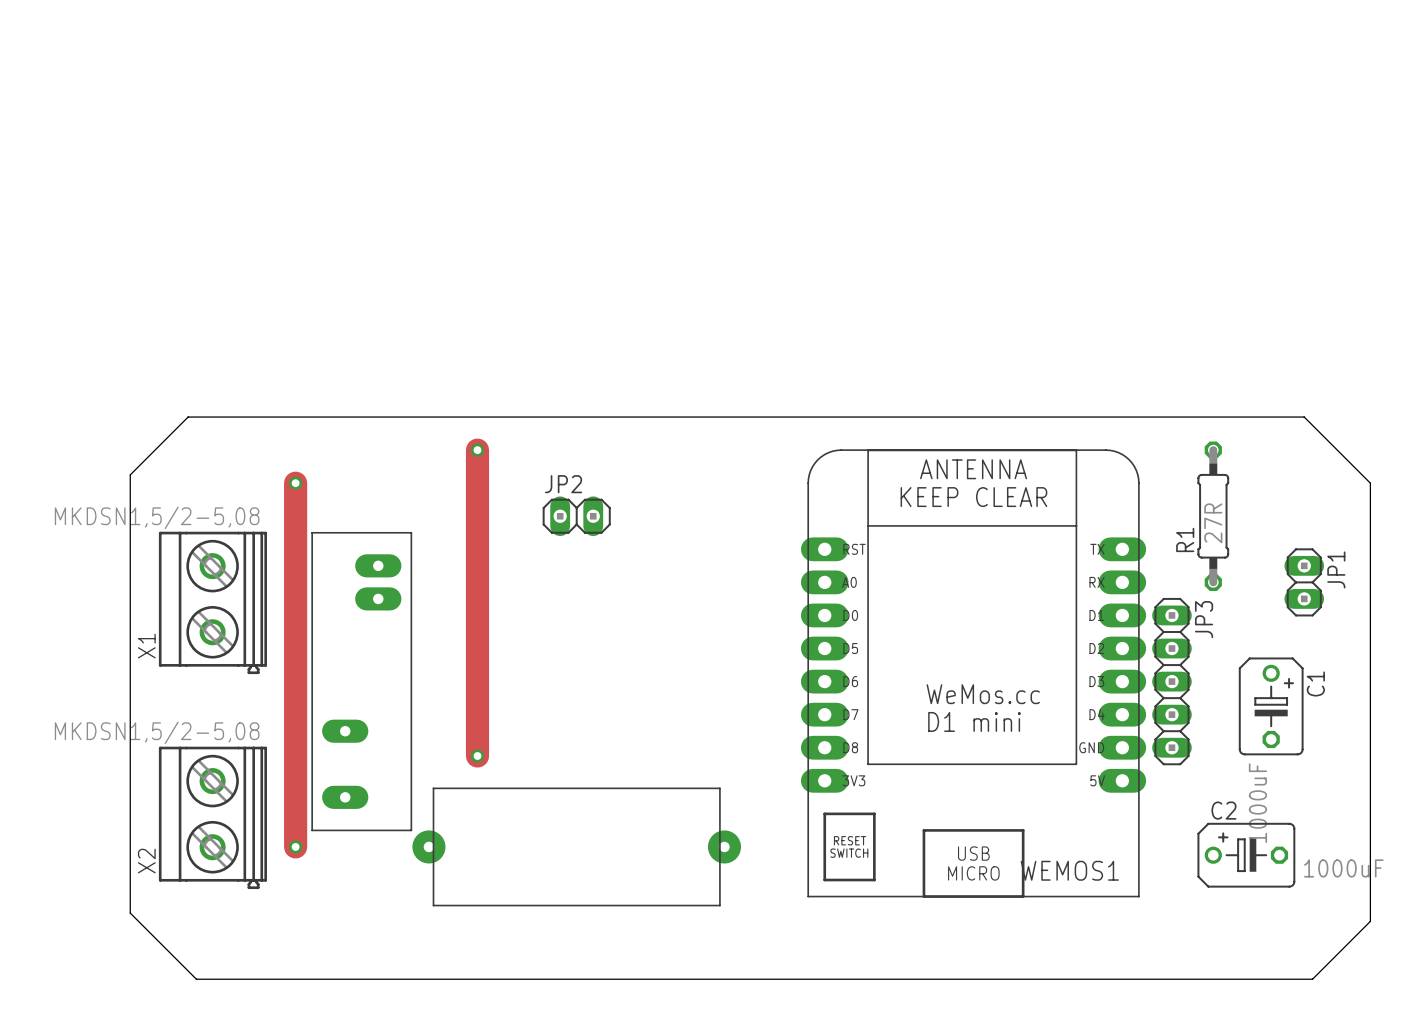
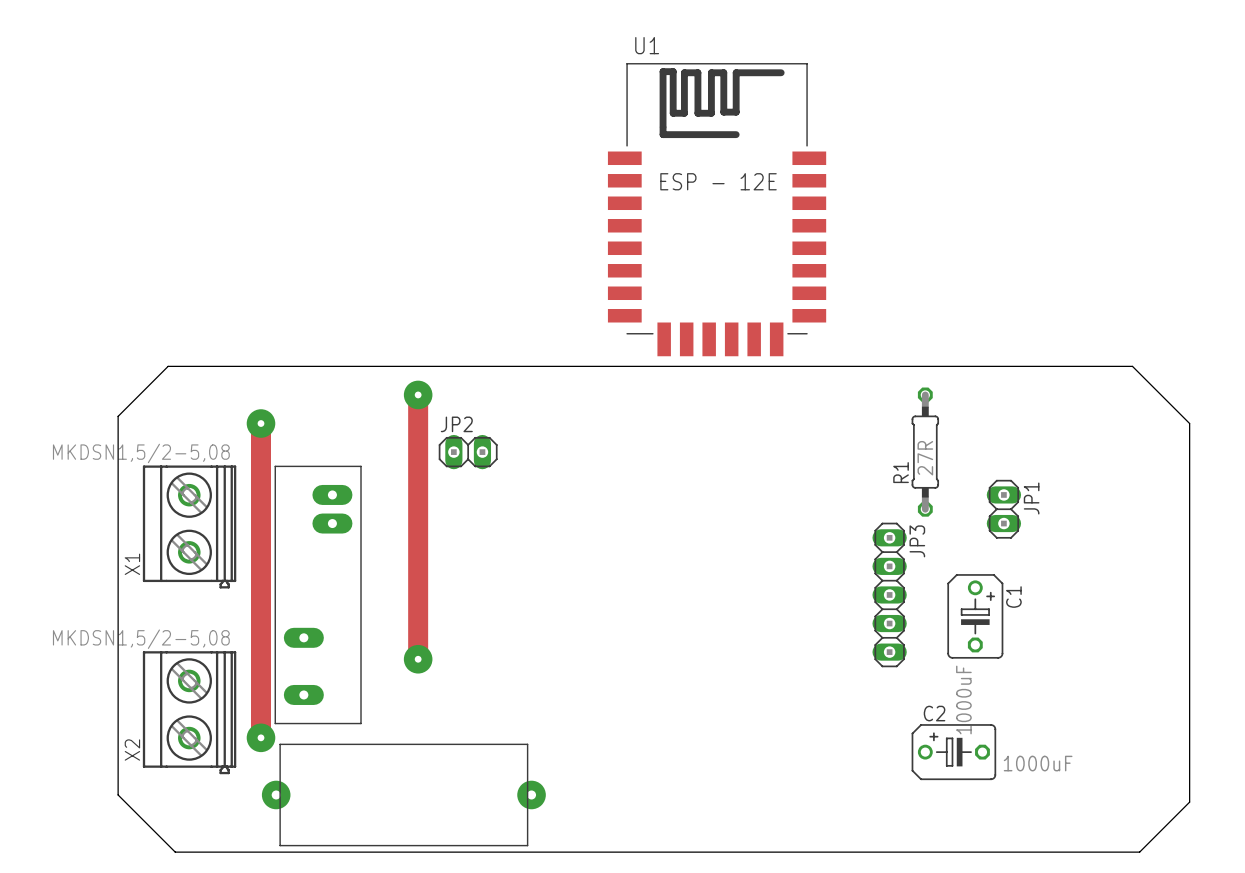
U1: none -> (717, 209)
via size: [470, 443, 485, 457] -> [403, 380, 433, 410]
via size: [289, 476, 303, 490] -> [246, 409, 276, 438]
JP2 position: (576, 516) -> (468, 452)
R1 position: (1213, 516) -> (925, 452)
JP1 position: (1304, 582) -> (1003, 509)
WEMOS1: (973, 673) -> none
JP3 position: (1171, 681) -> (889, 594)
C1 position: (1271, 706) -> (975, 616)
via size: [470, 749, 485, 763] -> [403, 644, 433, 674]
via size: [289, 840, 303, 854] -> [246, 723, 276, 753]
part position: (576, 846) -> (403, 794)
C2 position: (1246, 855) -> (953, 752)

